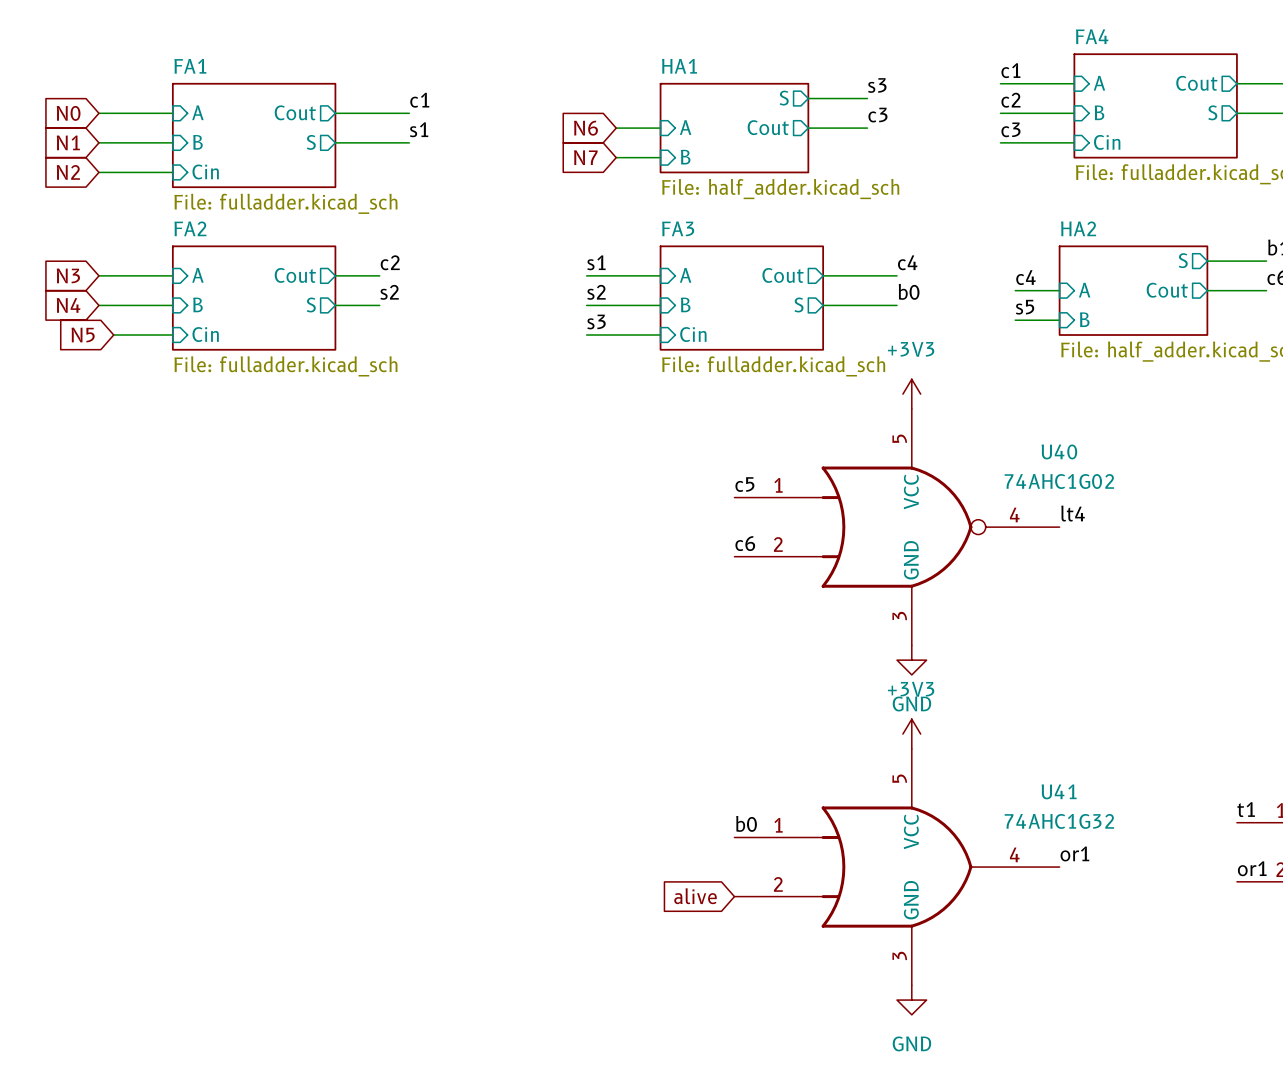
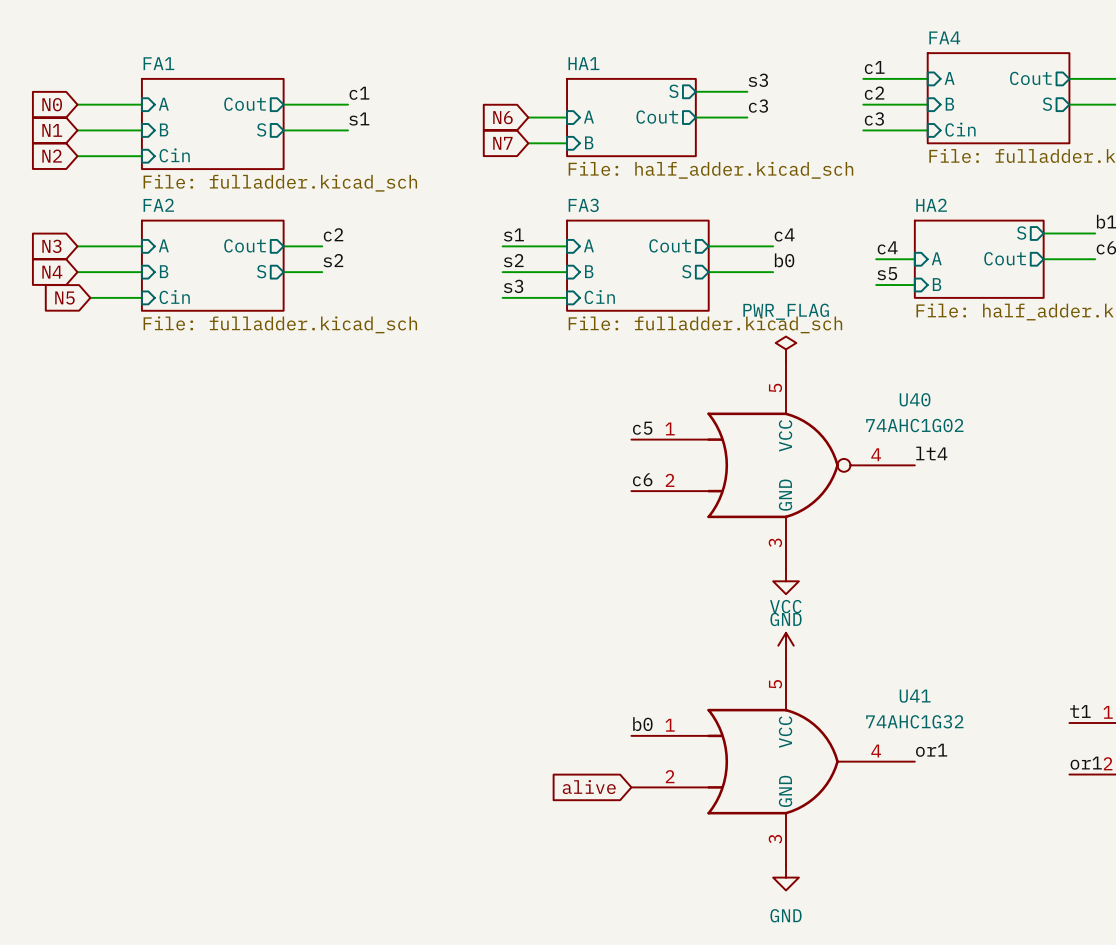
power symbol: +3V3 (911, 394) -> PWR_FLAG (786, 349)
power symbol: +3V3 (911, 734) -> VCC (786, 645)

